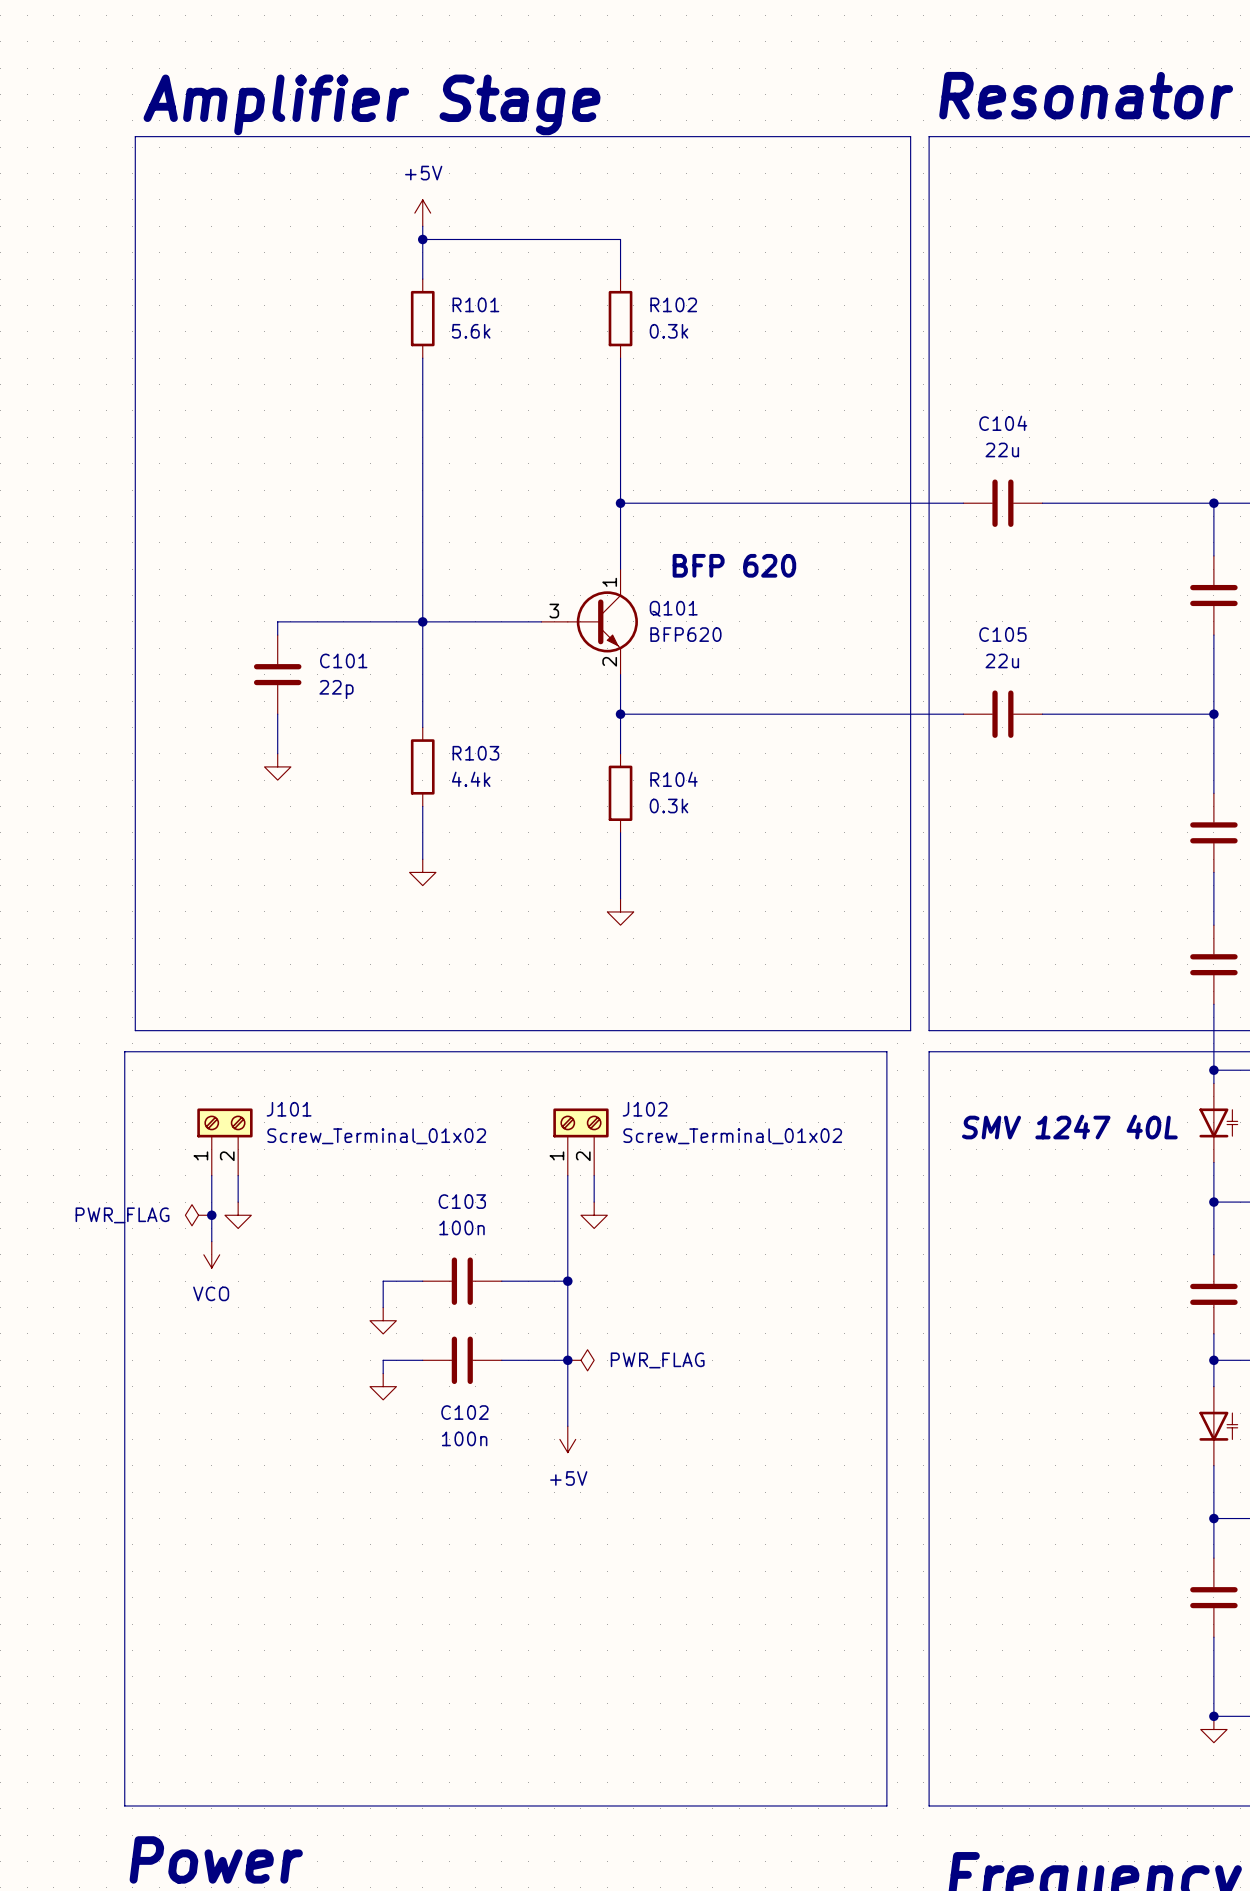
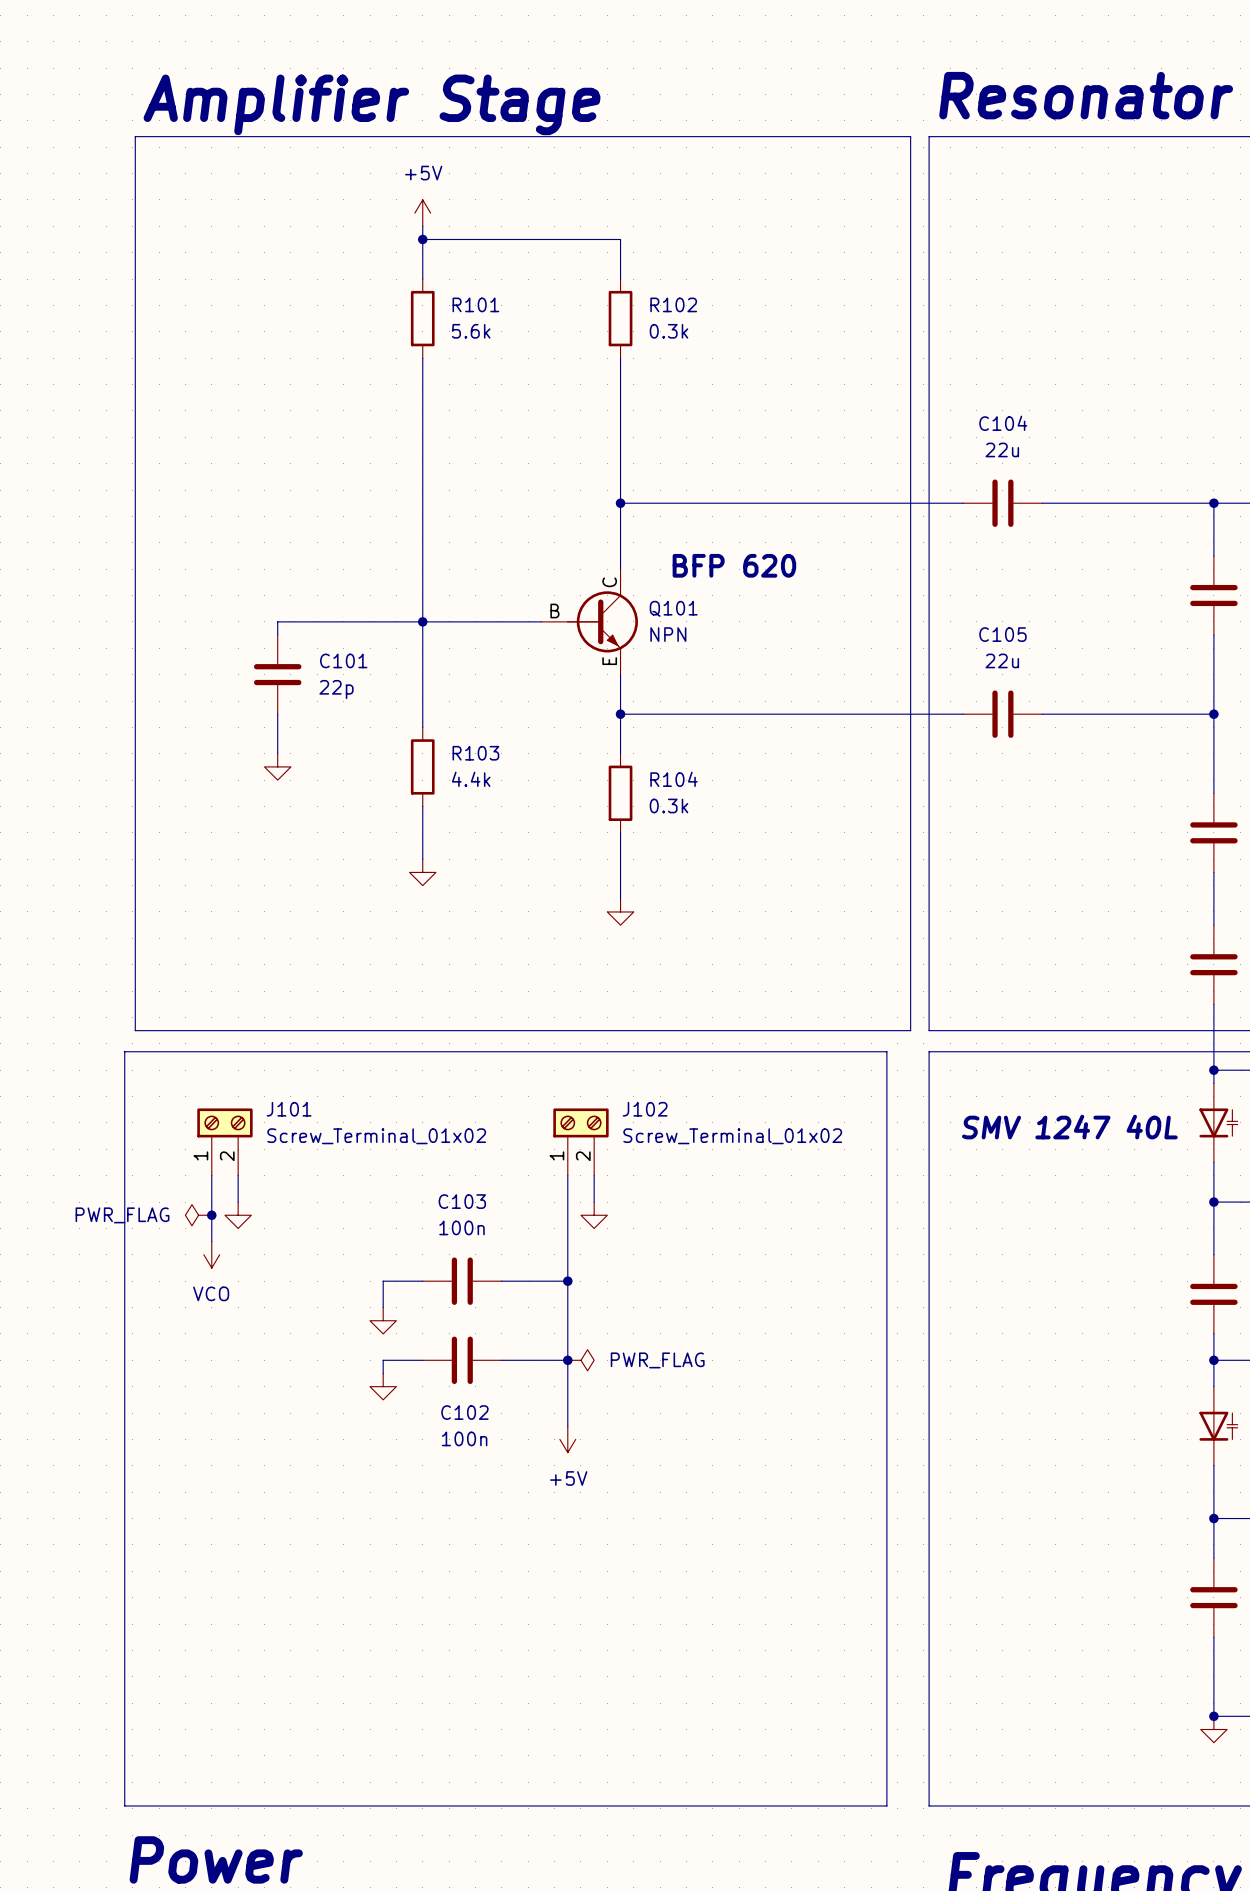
Q101 symbol: [541, 569, 638, 675] -> [541, 569, 638, 675]
Q101 value: BFP620 (685, 634) -> NPN (668, 634)

